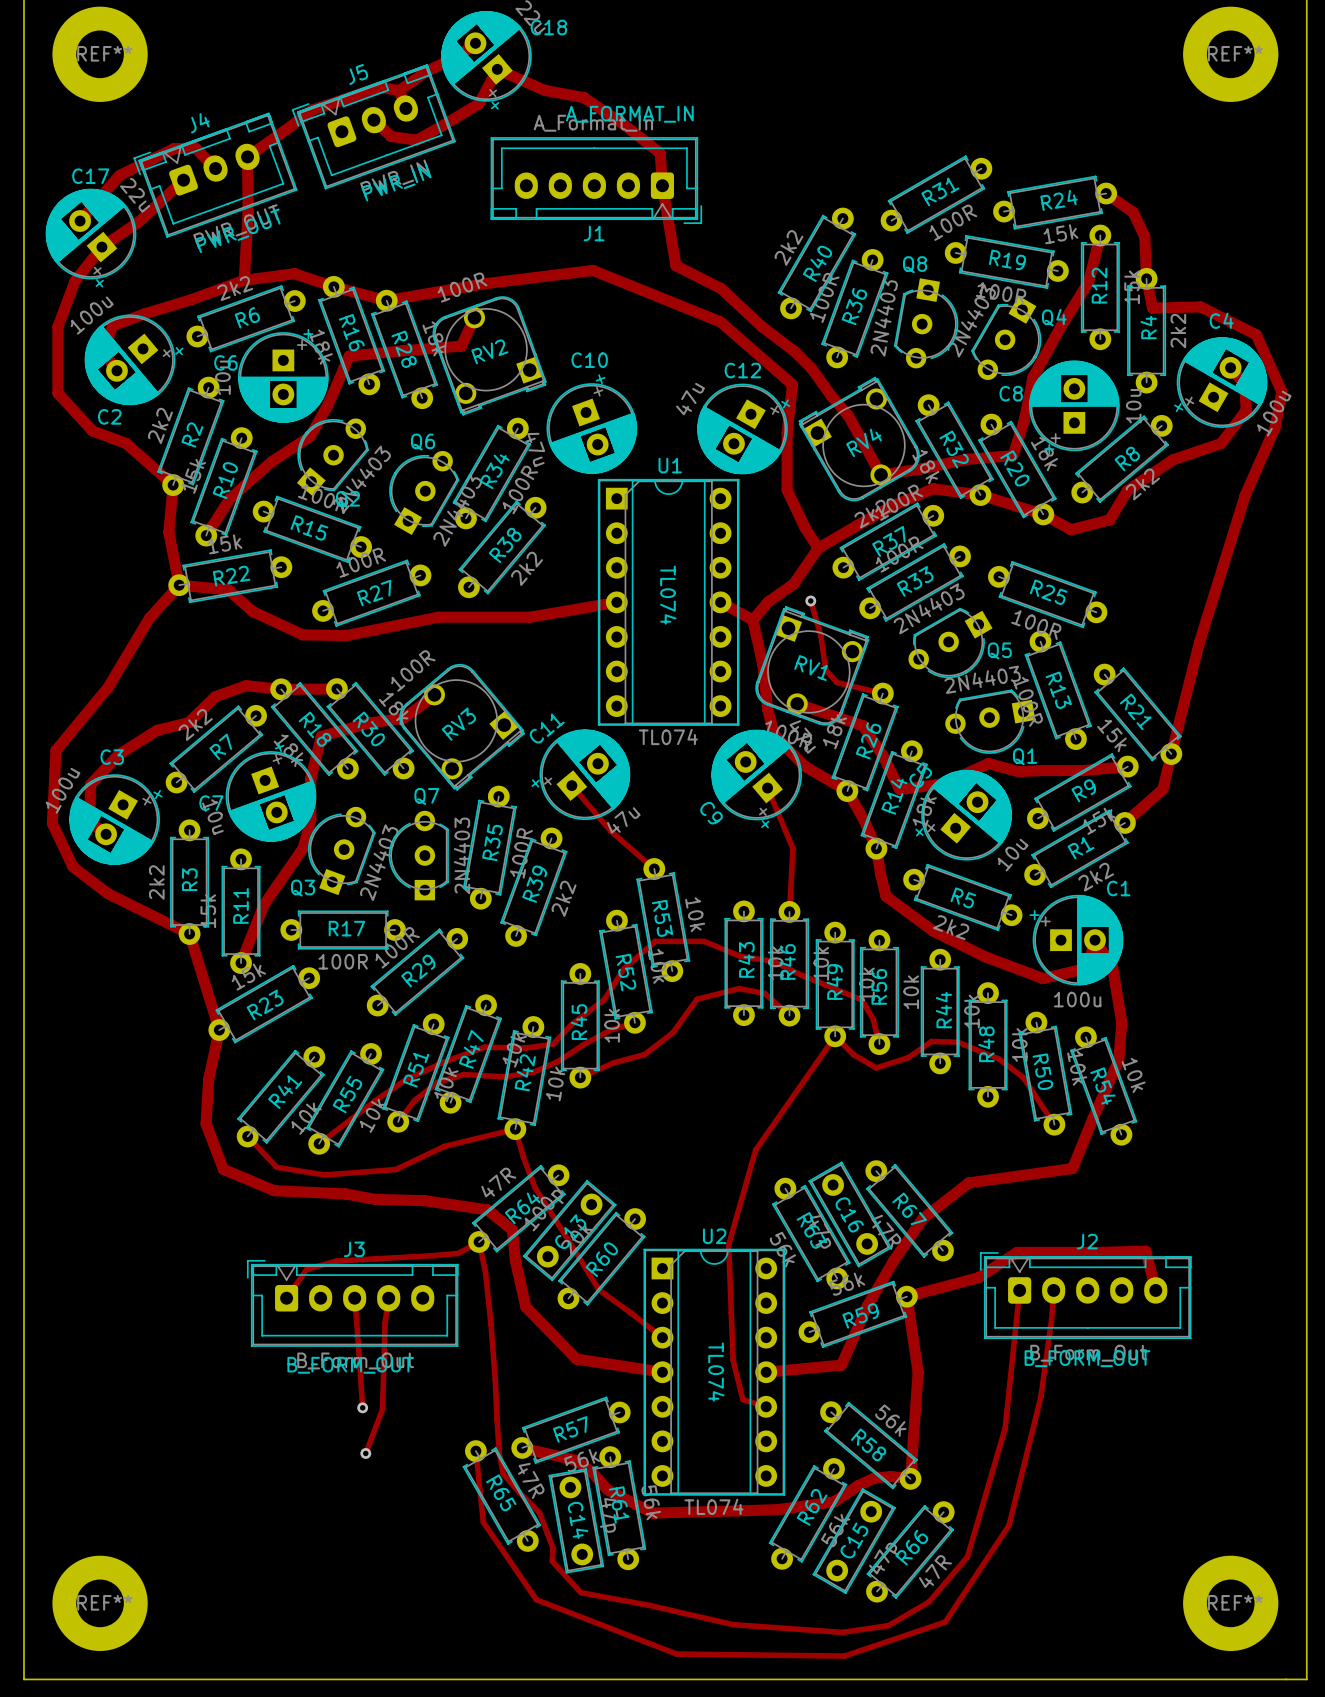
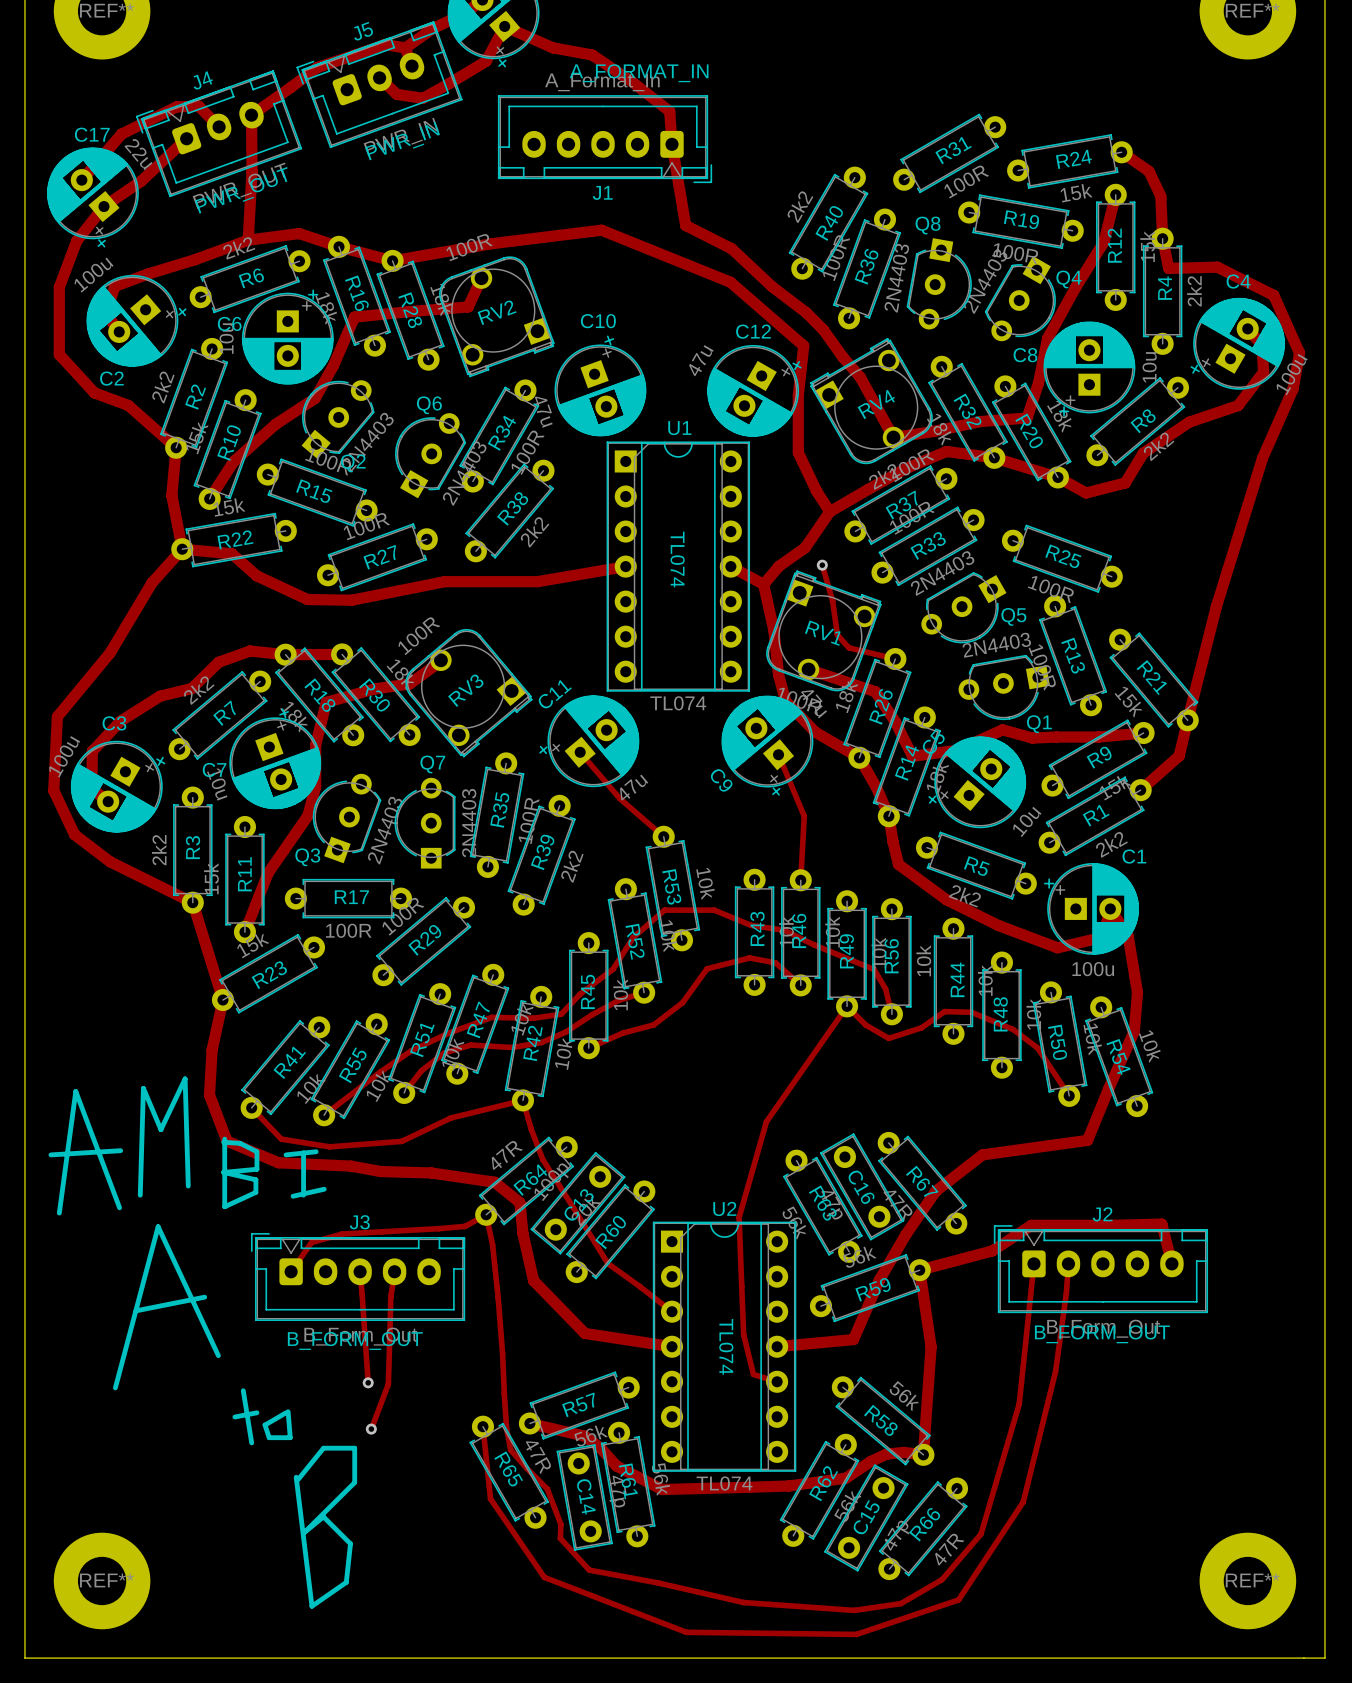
line: none -> (224, 1139) (224, 1206) (255, 1192) (255, 1179) (223, 1172) (256, 1169) (256, 1151) (240, 1143) (223, 1142)
line: none -> (120, 1150) (50, 1154)
line: none -> (316, 1151) (286, 1154)
line: none -> (303, 1152) (303, 1195)
line: none -> (188, 1186) (185, 1078) (160, 1129) (143, 1088) (140, 1195)
line: none -> (324, 1189) (293, 1196)
line: none -> (119, 1207) (75, 1091) (59, 1213)
line: none -> (204, 1297) (136, 1310)
line: none -> (218, 1355) (158, 1226) (115, 1387)
line: none -> (243, 1390) (251, 1442)
line: none -> (288, 1411) (290, 1437) (269, 1437) (265, 1425) (286, 1412)
line: none -> (256, 1412) (234, 1417)
line: none -> (296, 1477) (311, 1606) (346, 1582) (350, 1543) (323, 1516) (304, 1532) (354, 1482) (354, 1448) (323, 1448) (298, 1479)

